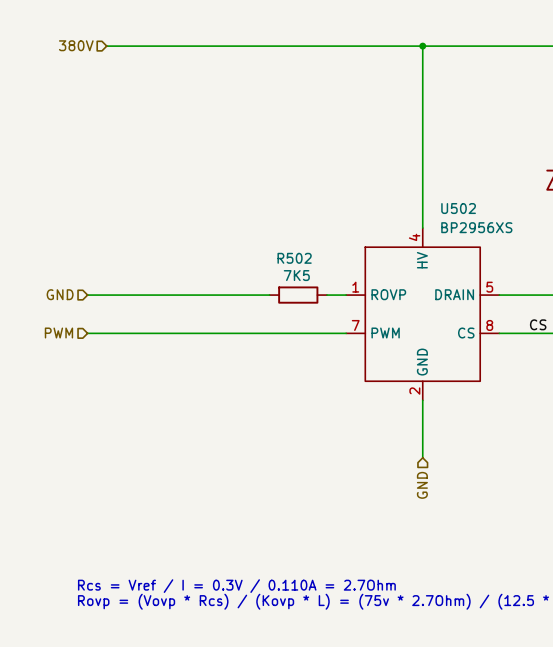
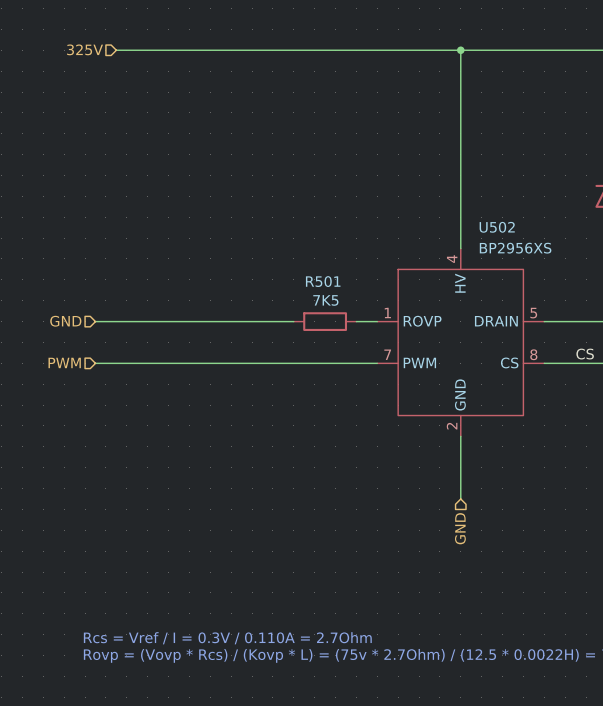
hierarchical label: 380V (76, 45) -> 325V (85, 49)
R502 name: R502 (294, 258) -> R501 (323, 281)

